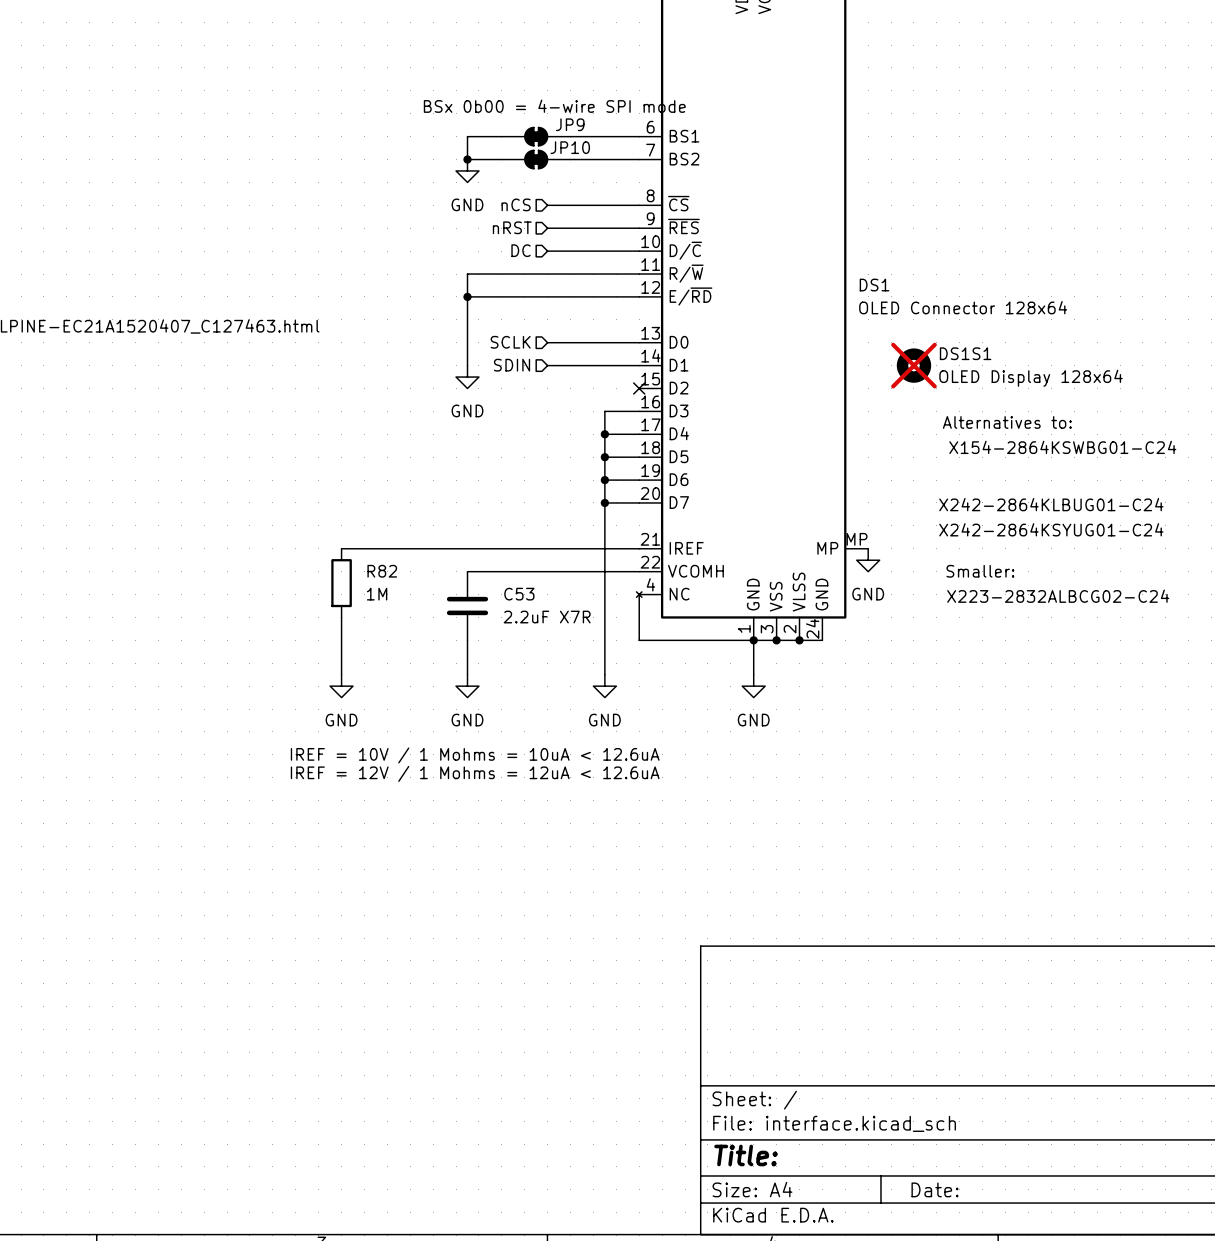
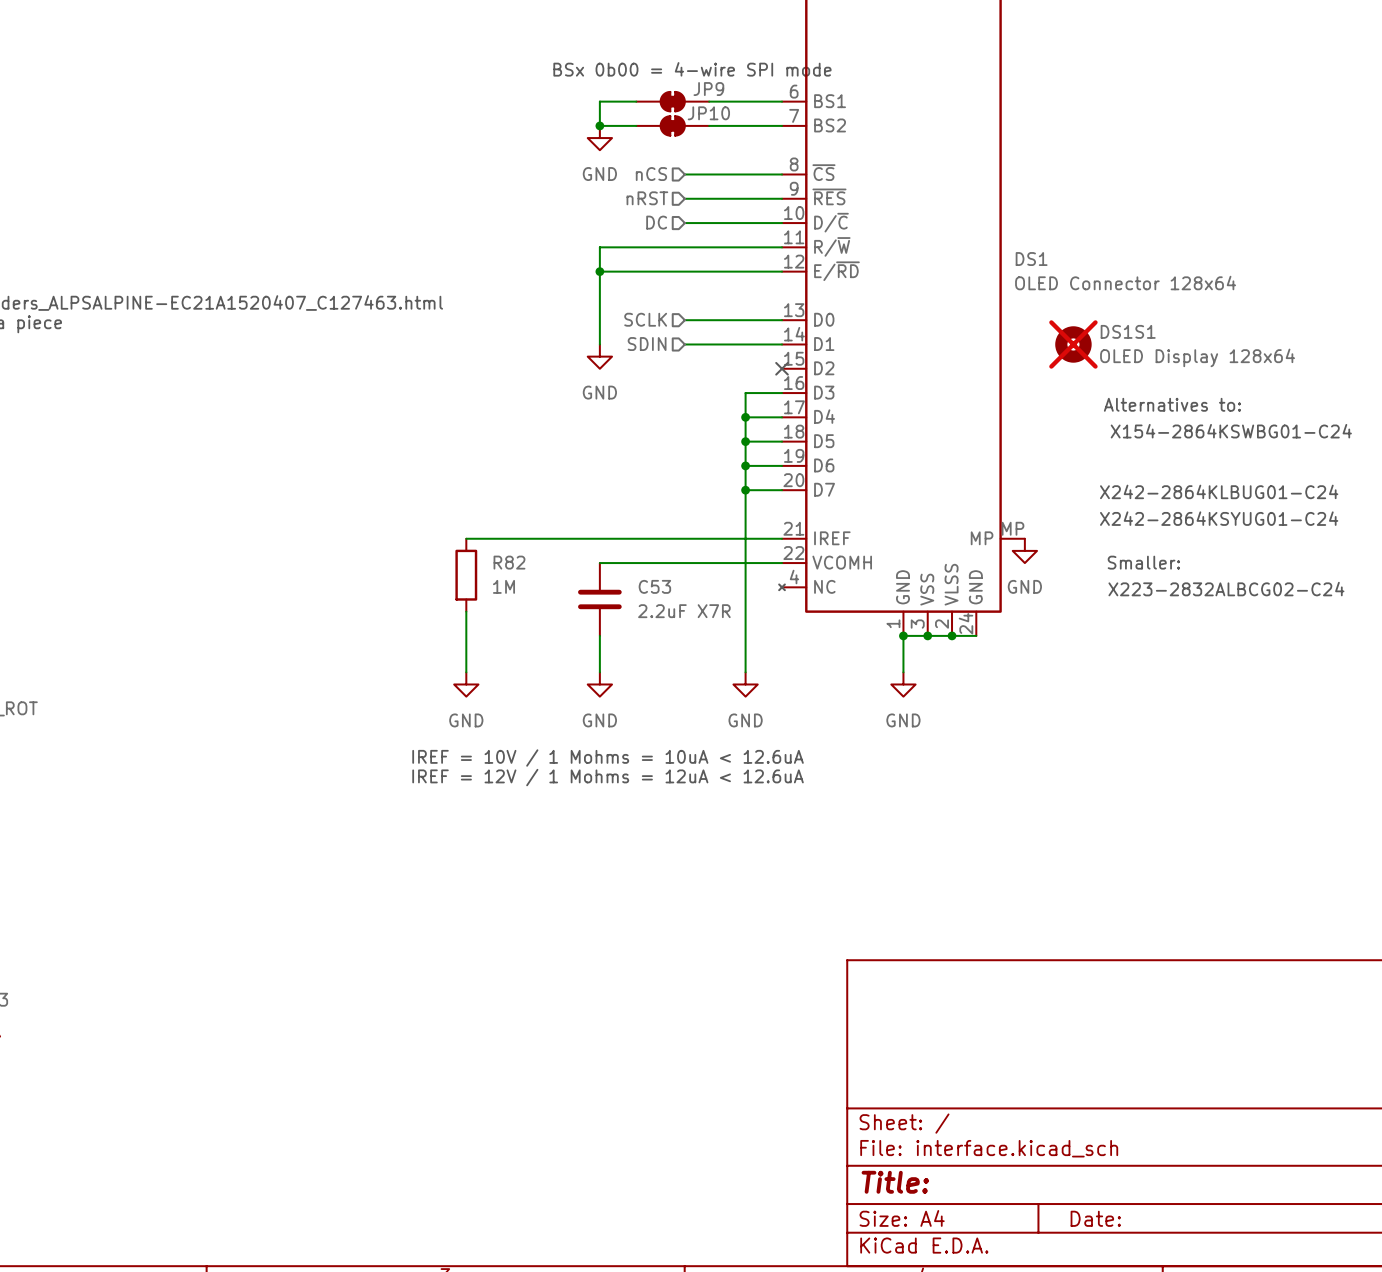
wire: (639, 594) (639, 640) (753, 640) -> none

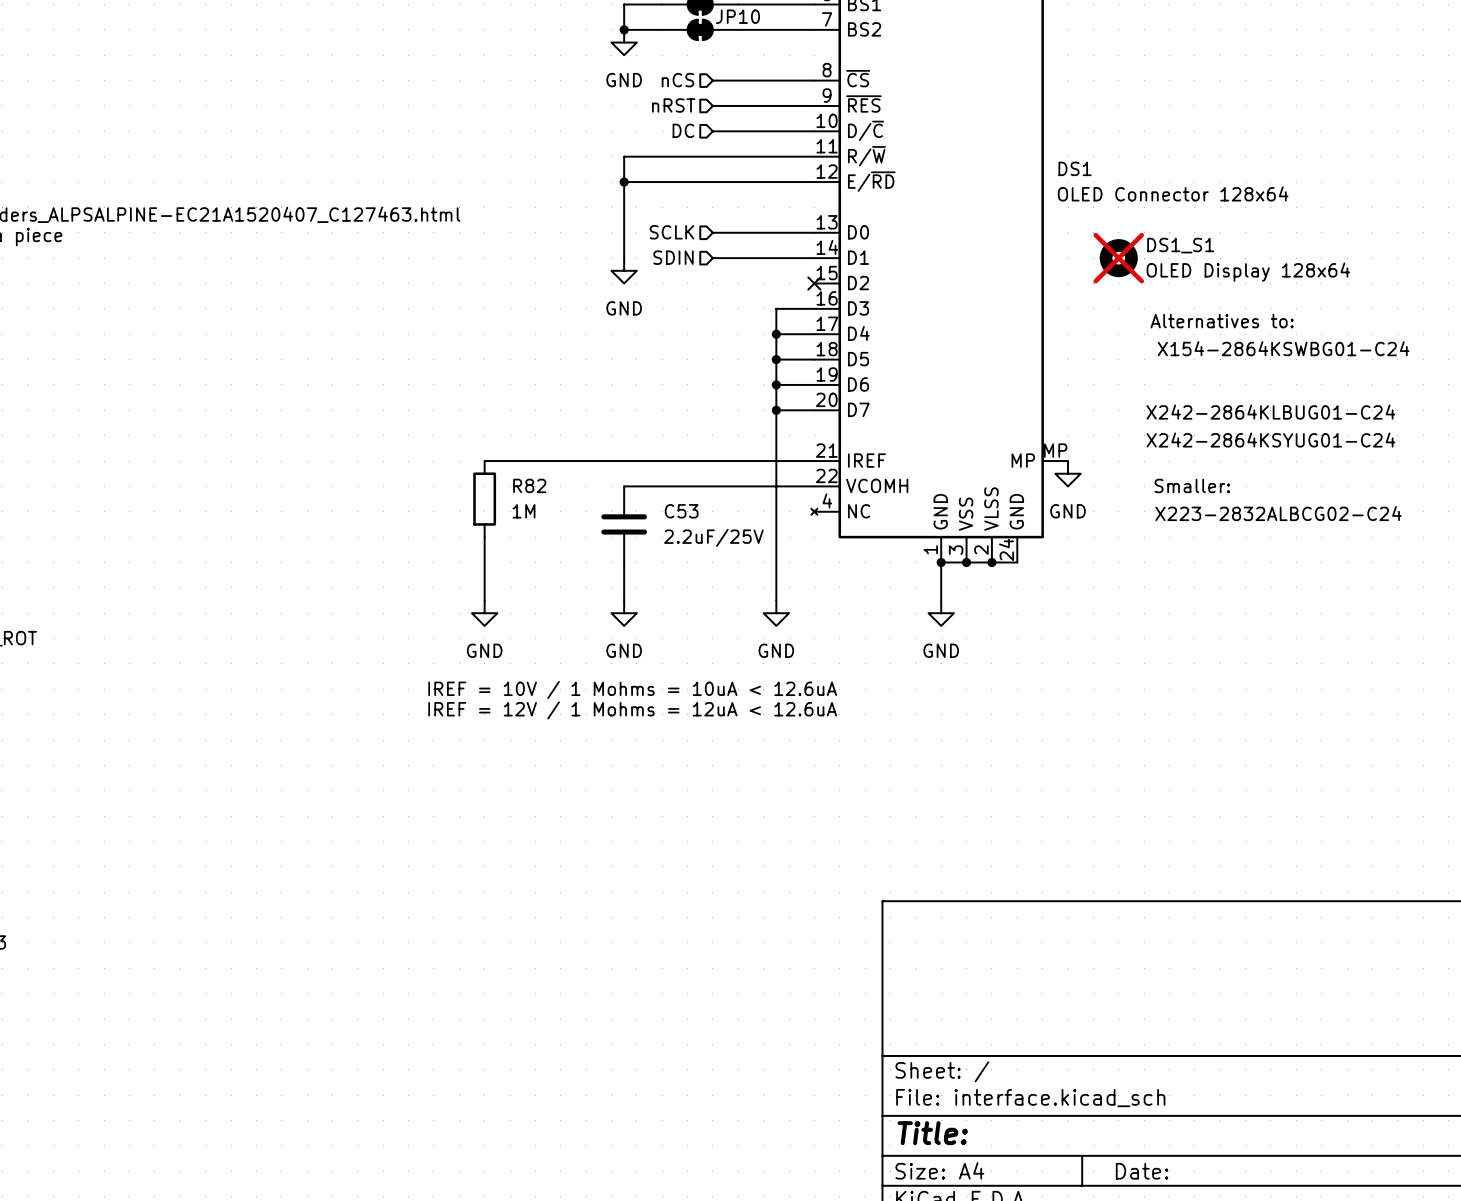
DS1S1 name: DS1S1 (1128, 331) -> DS1_S1 (1180, 245)
C53 value: 2.2uF X7R (684, 611) -> 2.2uF/25V (713, 537)

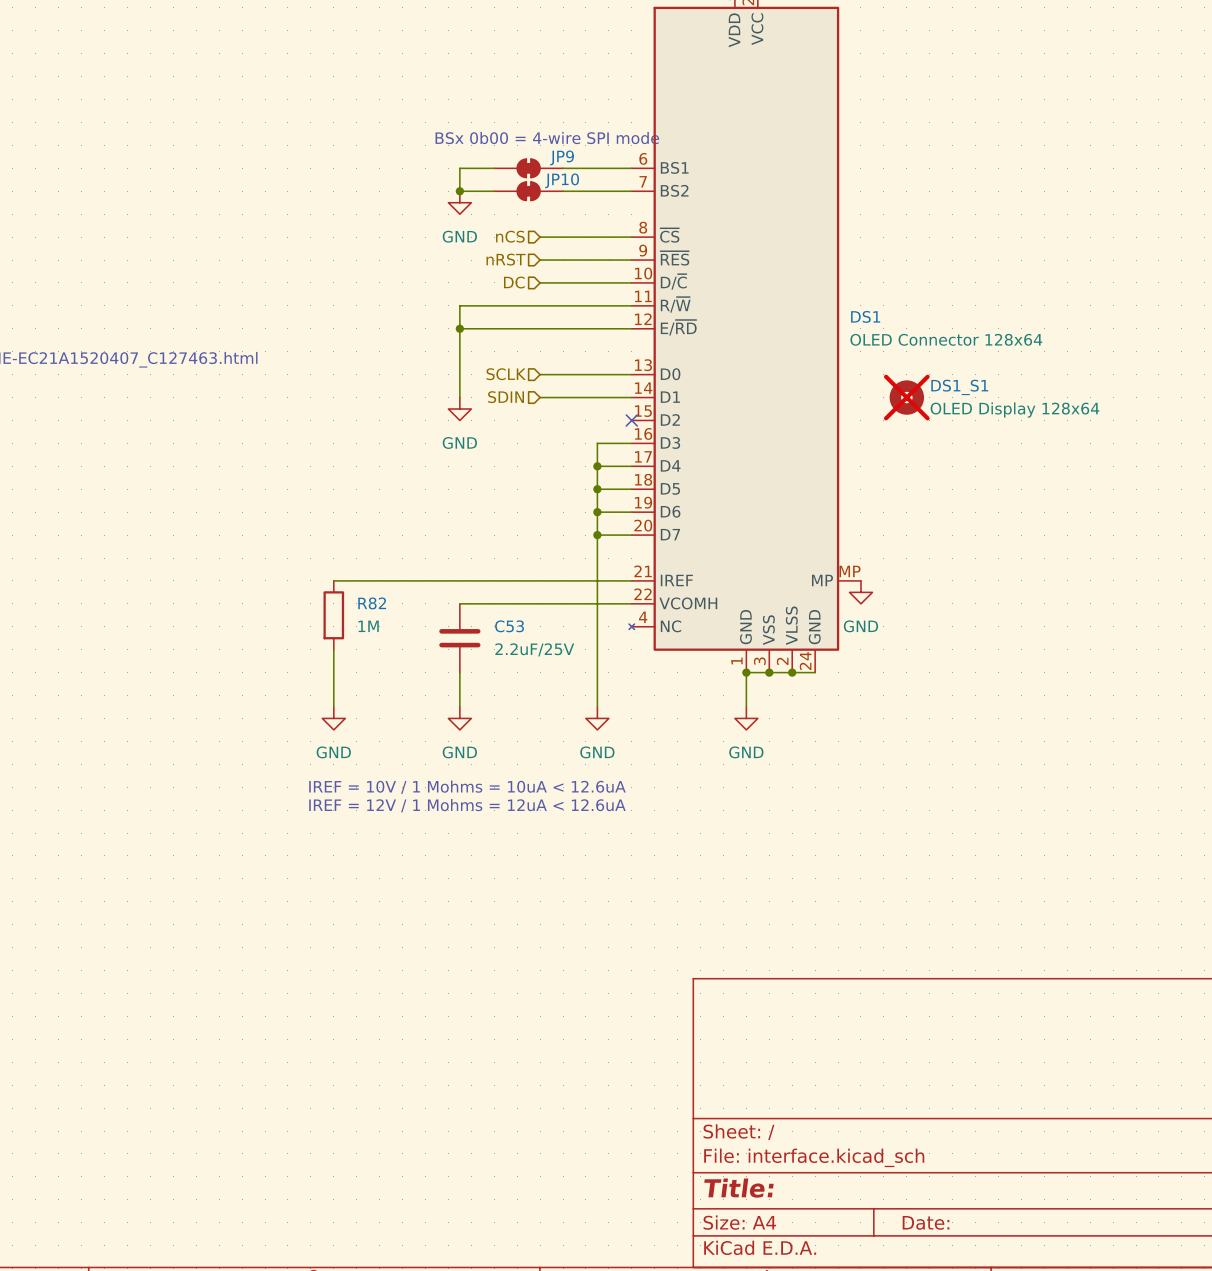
text: Alternatives to: (1222, 321) -> none
text: X154-2864KSWBG01-C24 (1283, 348) -> none
text: X242-2864KLBUG01-C24 (1270, 412) -> none
text: X242-2864KSYUG01-C24 (1270, 440) -> none
text: Smaller: (1192, 485) -> none
text: X223-2832ALBCG02-C24 (1278, 513) -> none

